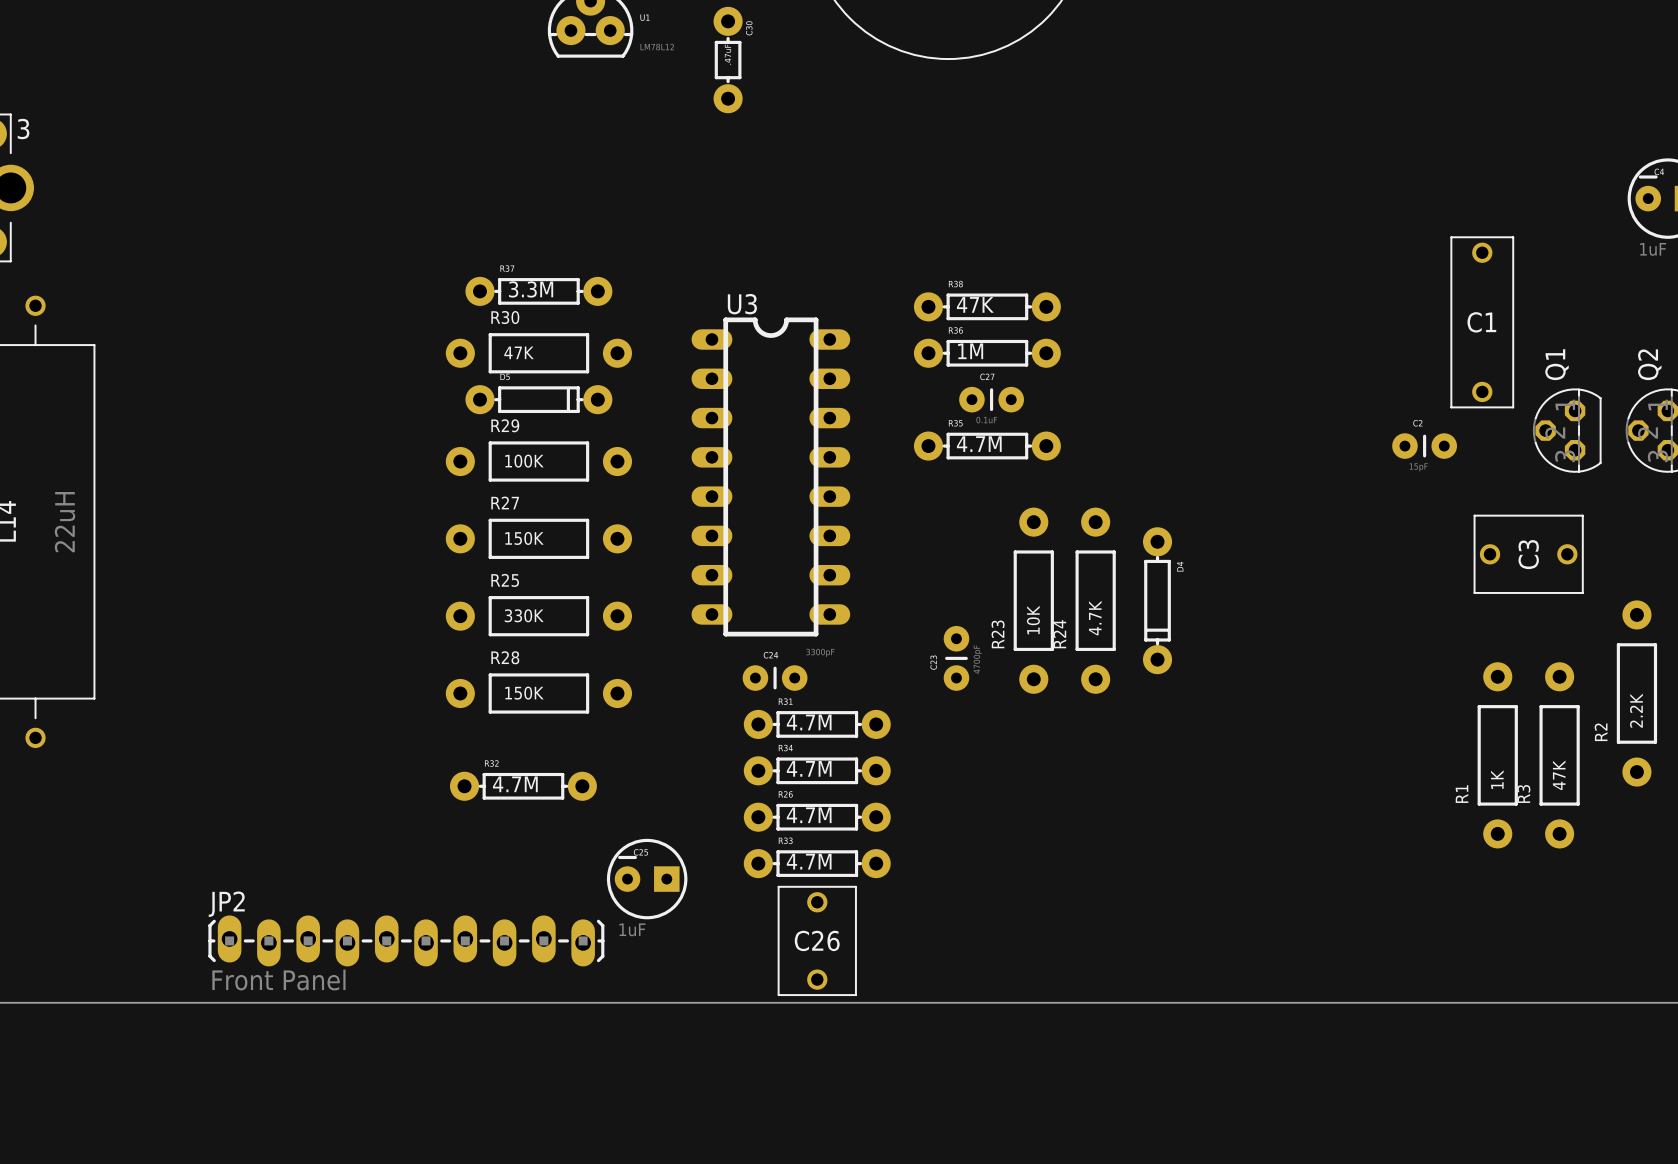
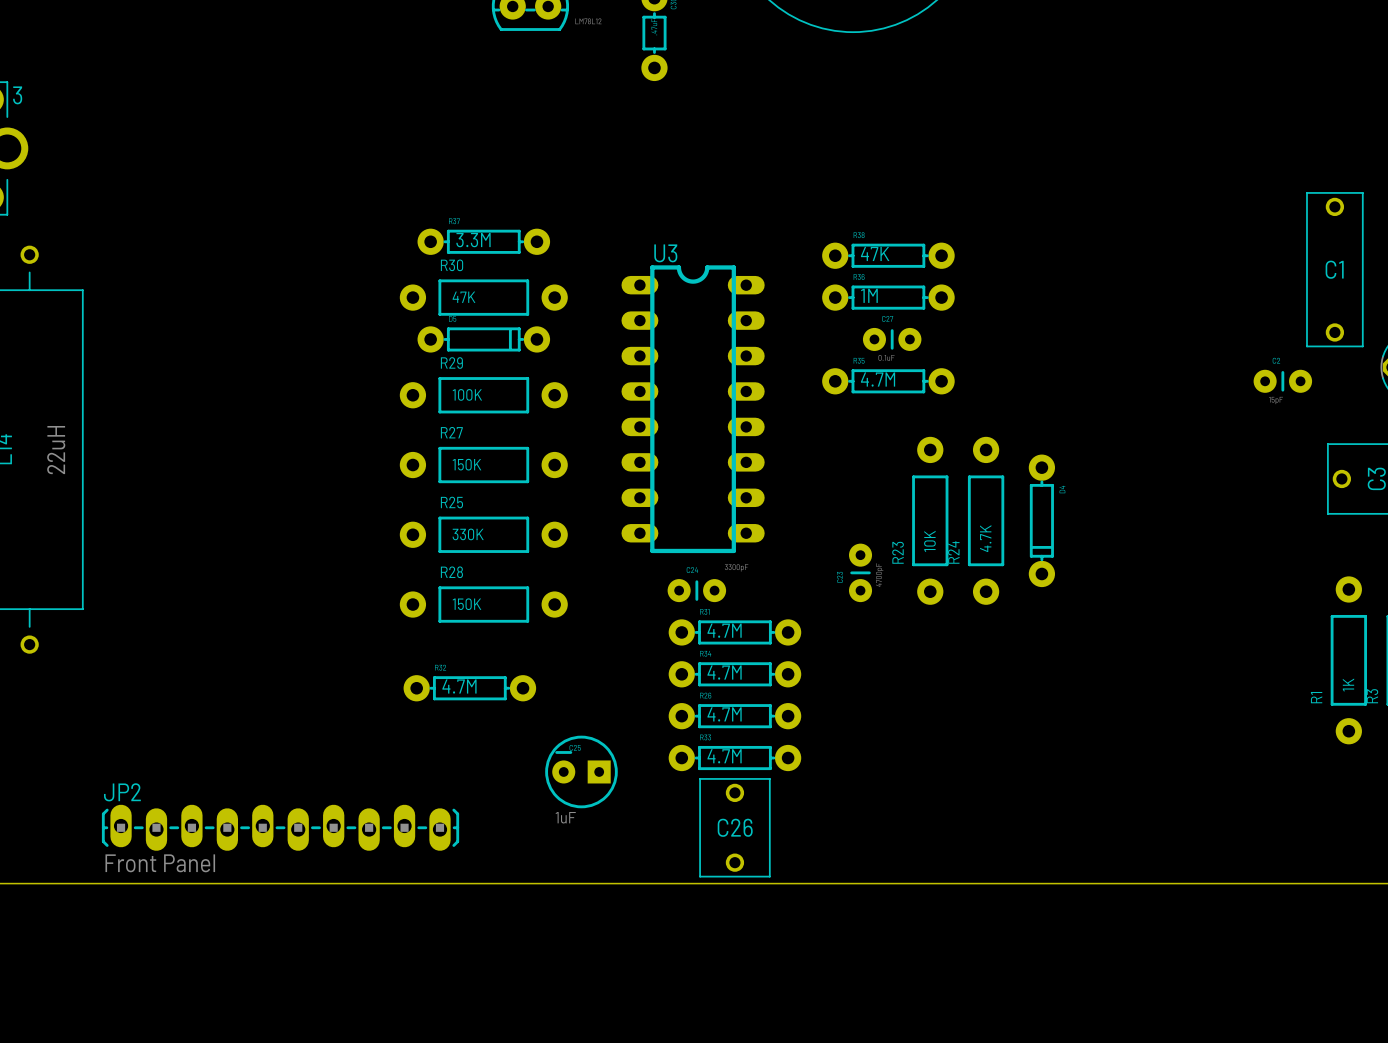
JP2 position: (406, 940) -> (280, 827)

